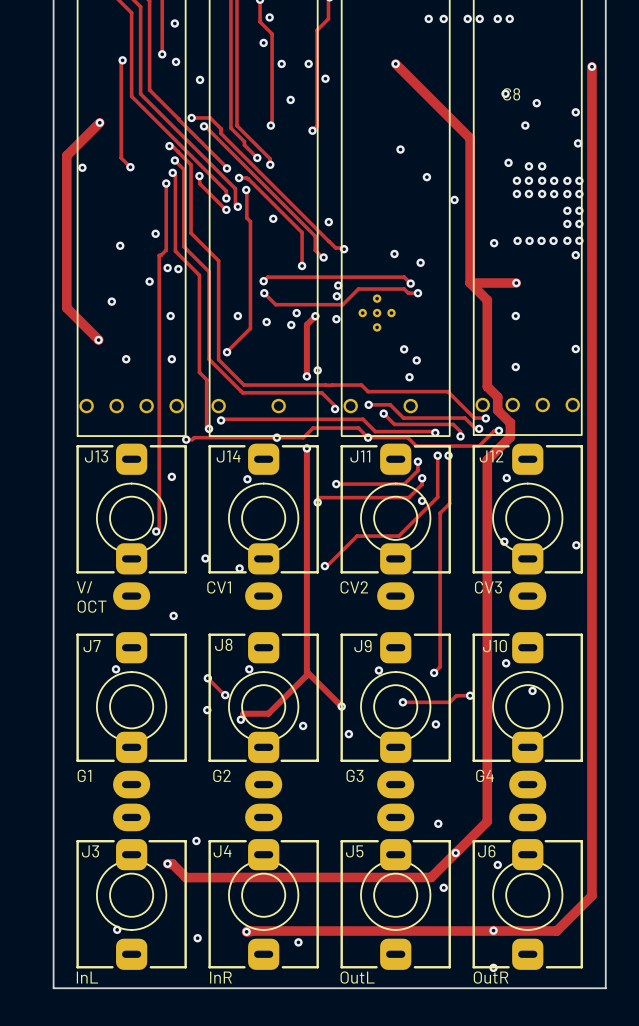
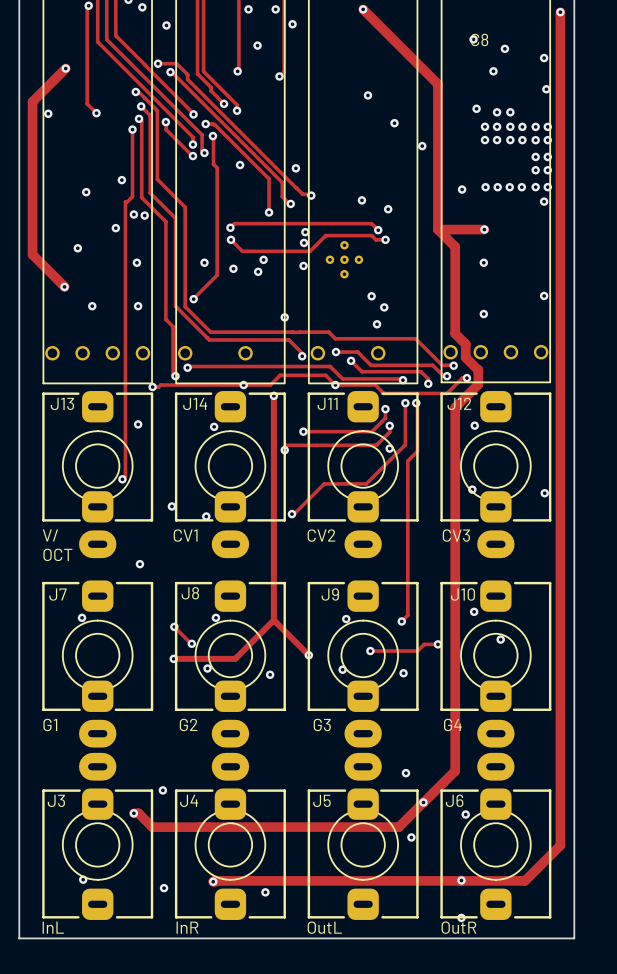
track: (315, 316) (306, 324) (306, 376) -> none
via: (315, 316) -> none
via: (306, 376) -> none
track: (306, 671) (306, 675) (268, 713) (243, 713) -> (273, 620) (235, 658) (173, 658)
via position: (348, 734) -> (342, 669)

